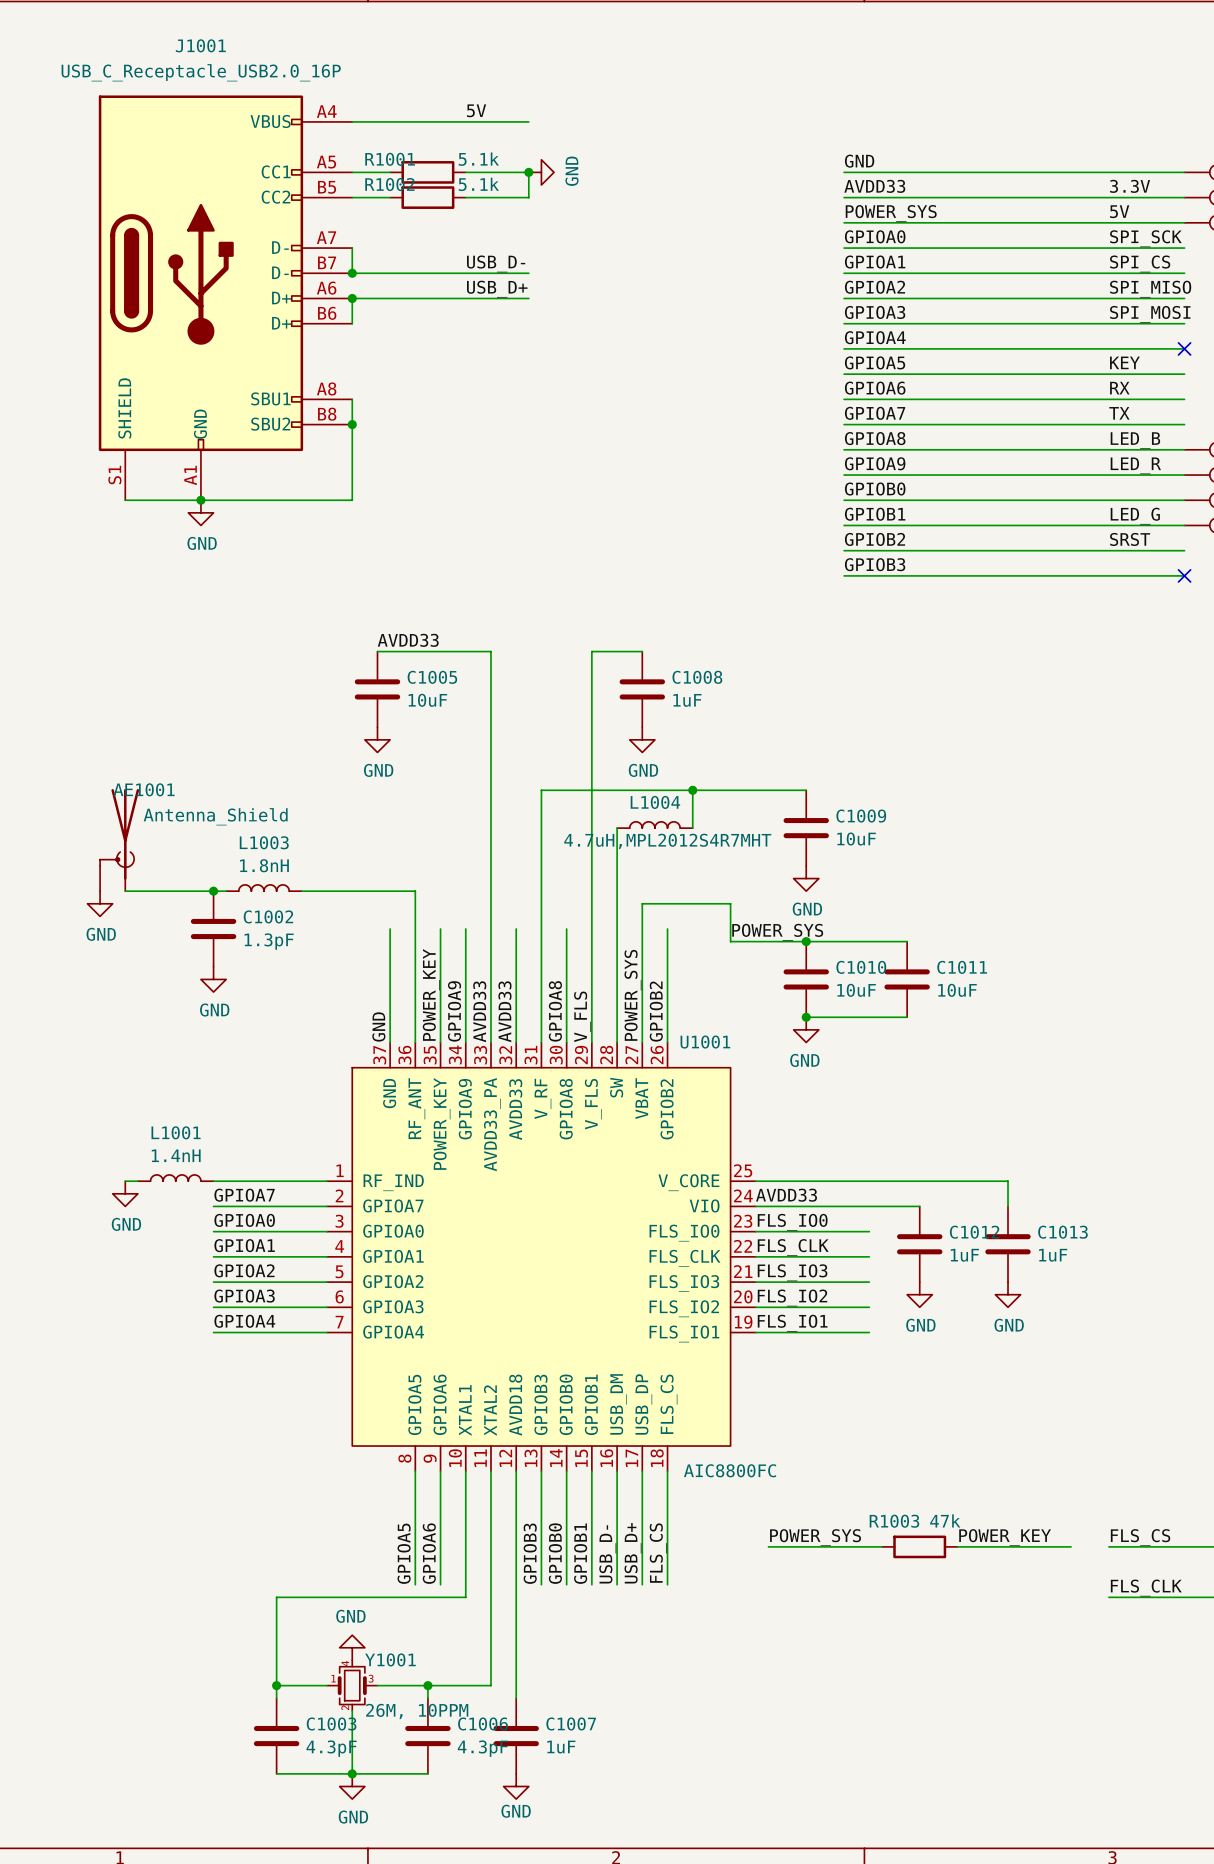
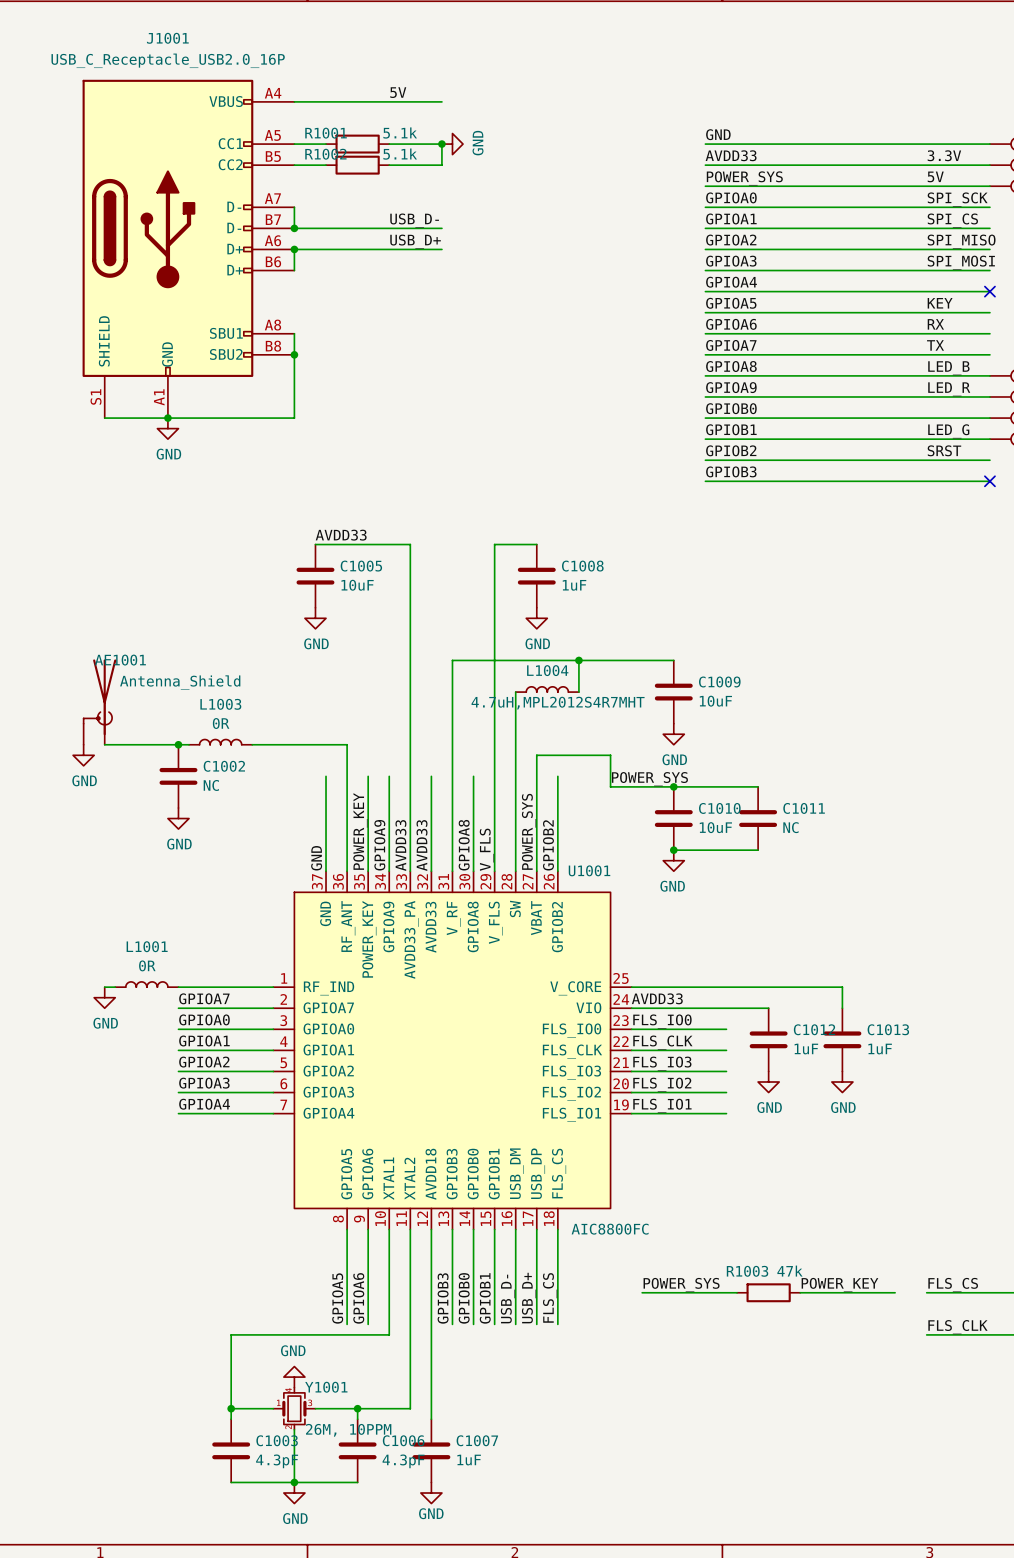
L1003 value: 1.8nH (264, 865) -> 0R (221, 723)
C1002 value: 1.3pF (269, 941) -> NC (211, 785)
C1011 value: 10uF (957, 990) -> NC (790, 827)
L1001 value: 1.4nH (176, 1155) -> 0R (147, 965)

